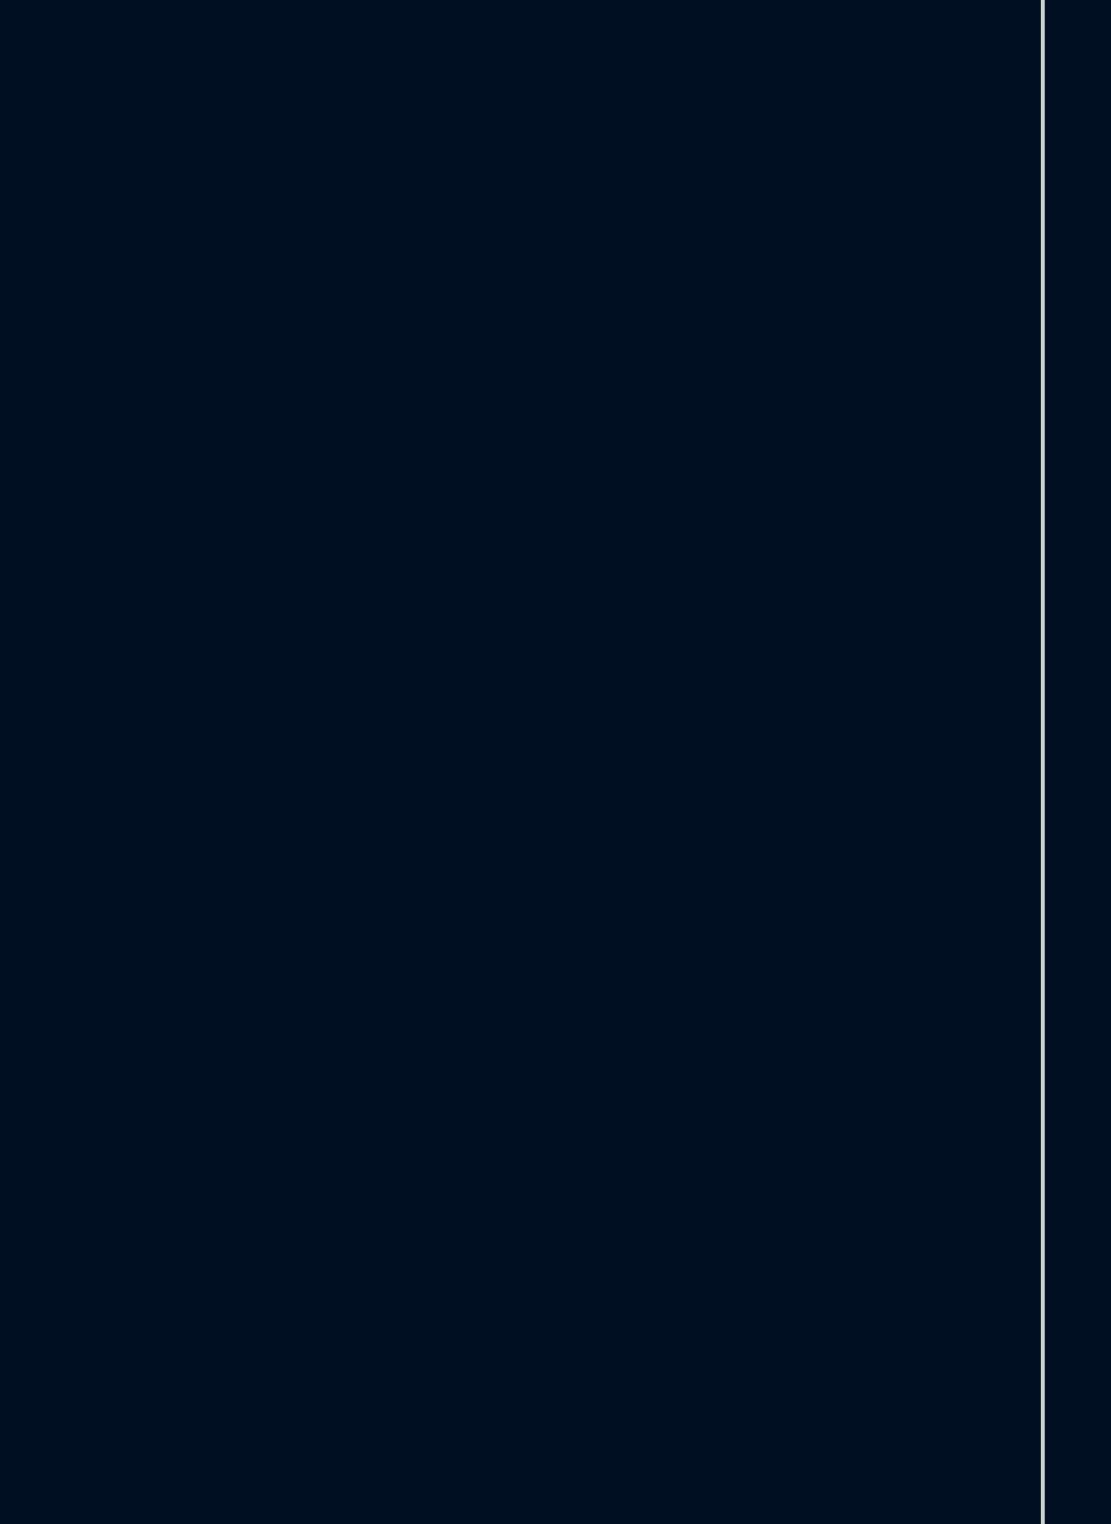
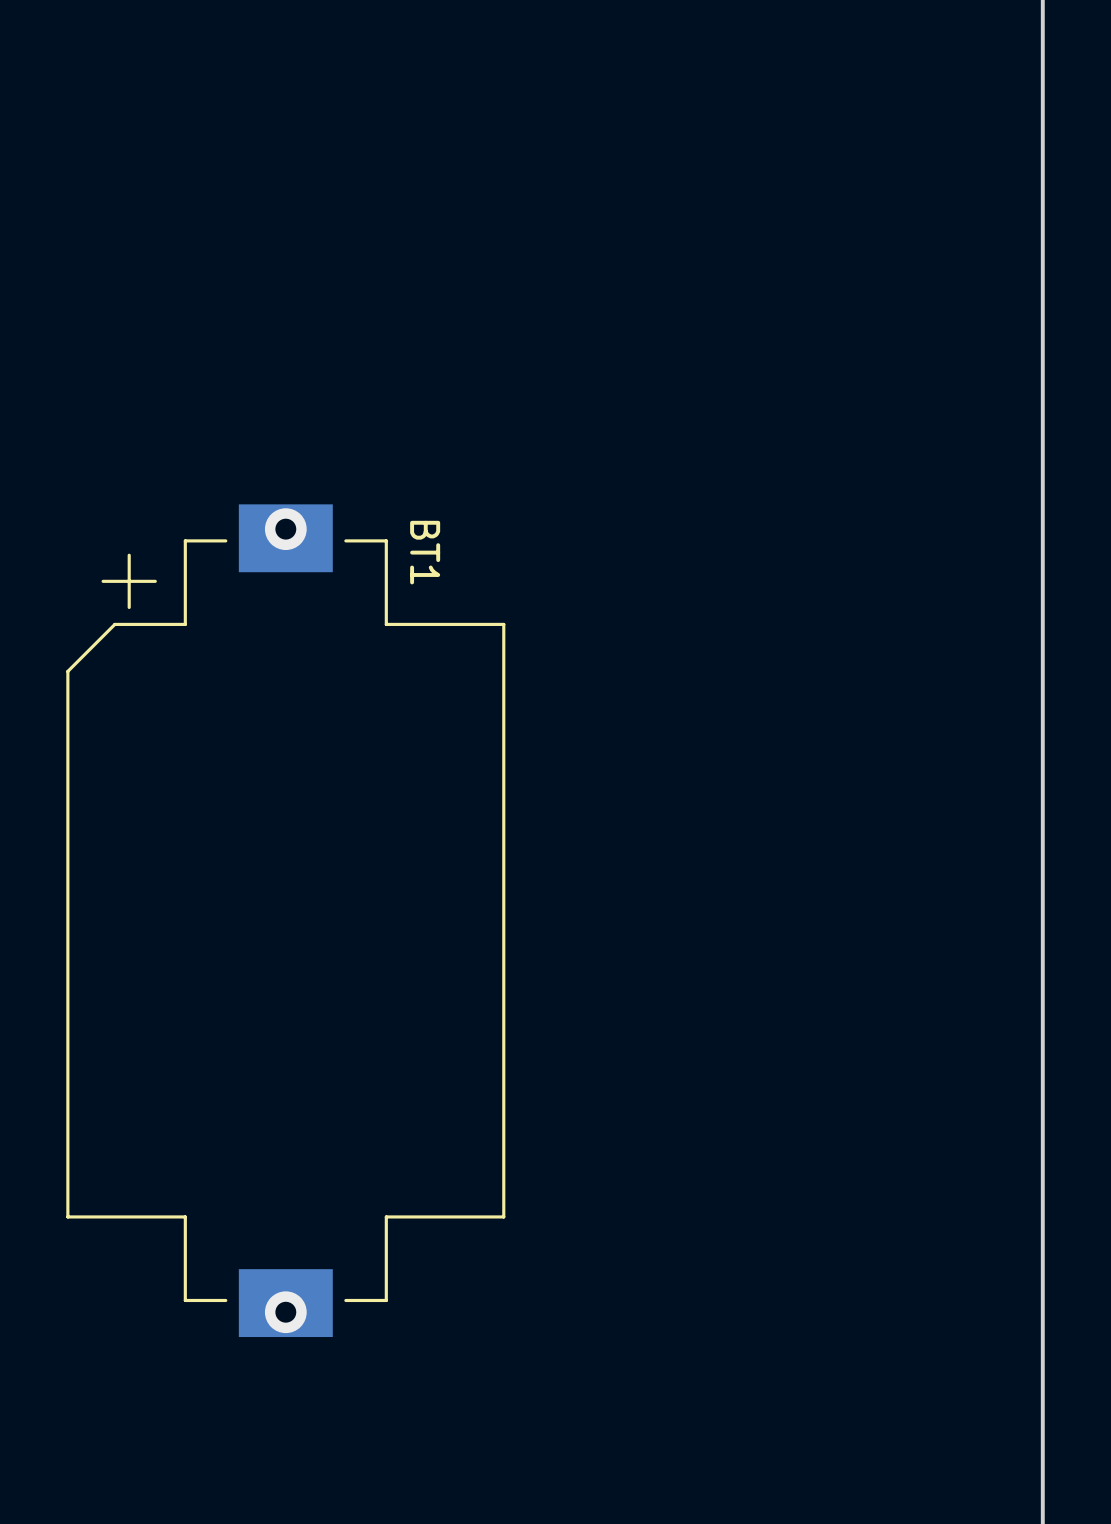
via: none -> (285, 529)
BT1: none -> (285, 920)
via: none -> (285, 1312)

